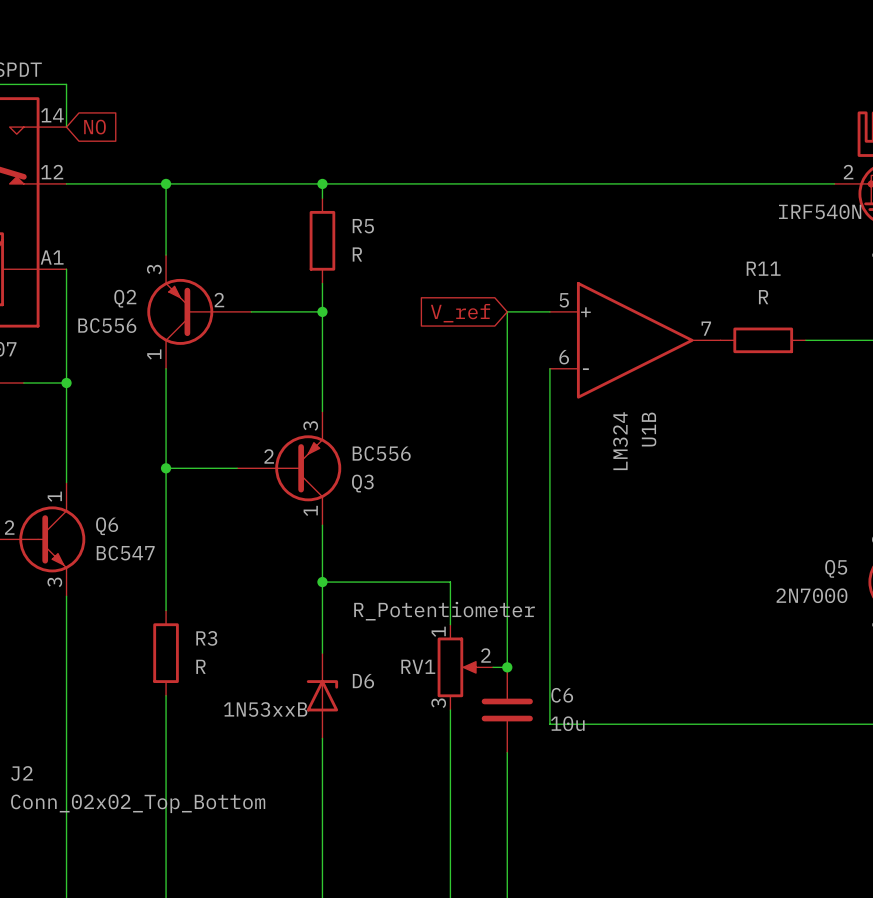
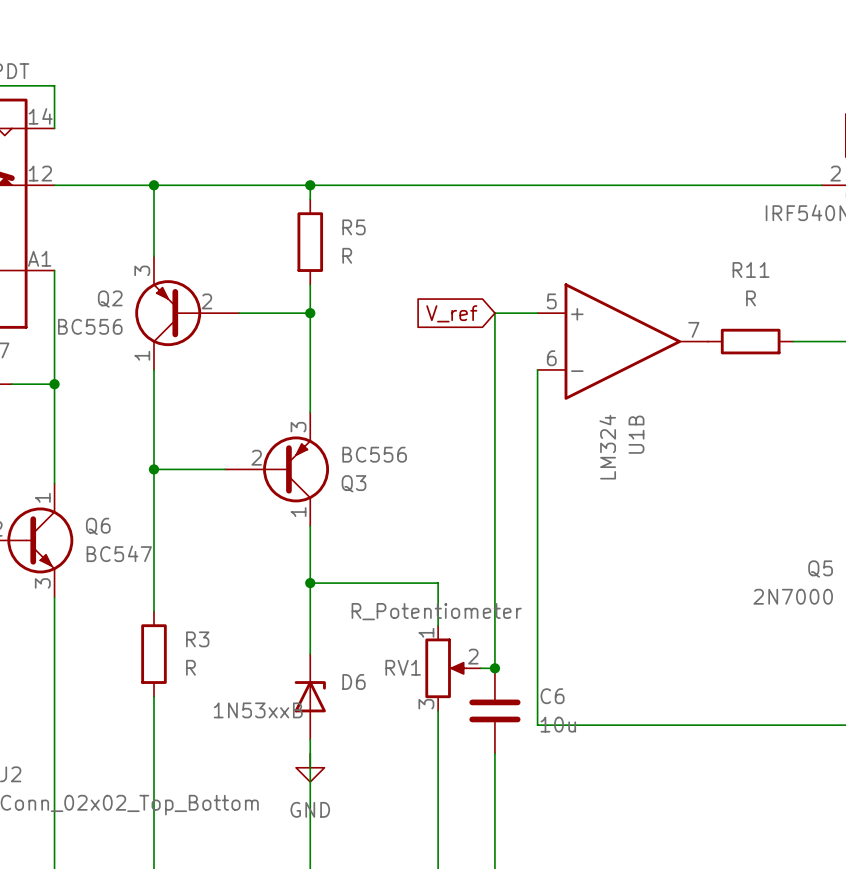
global label: NO (94, 127) -> none
power symbol: none -> GND (310, 767)

